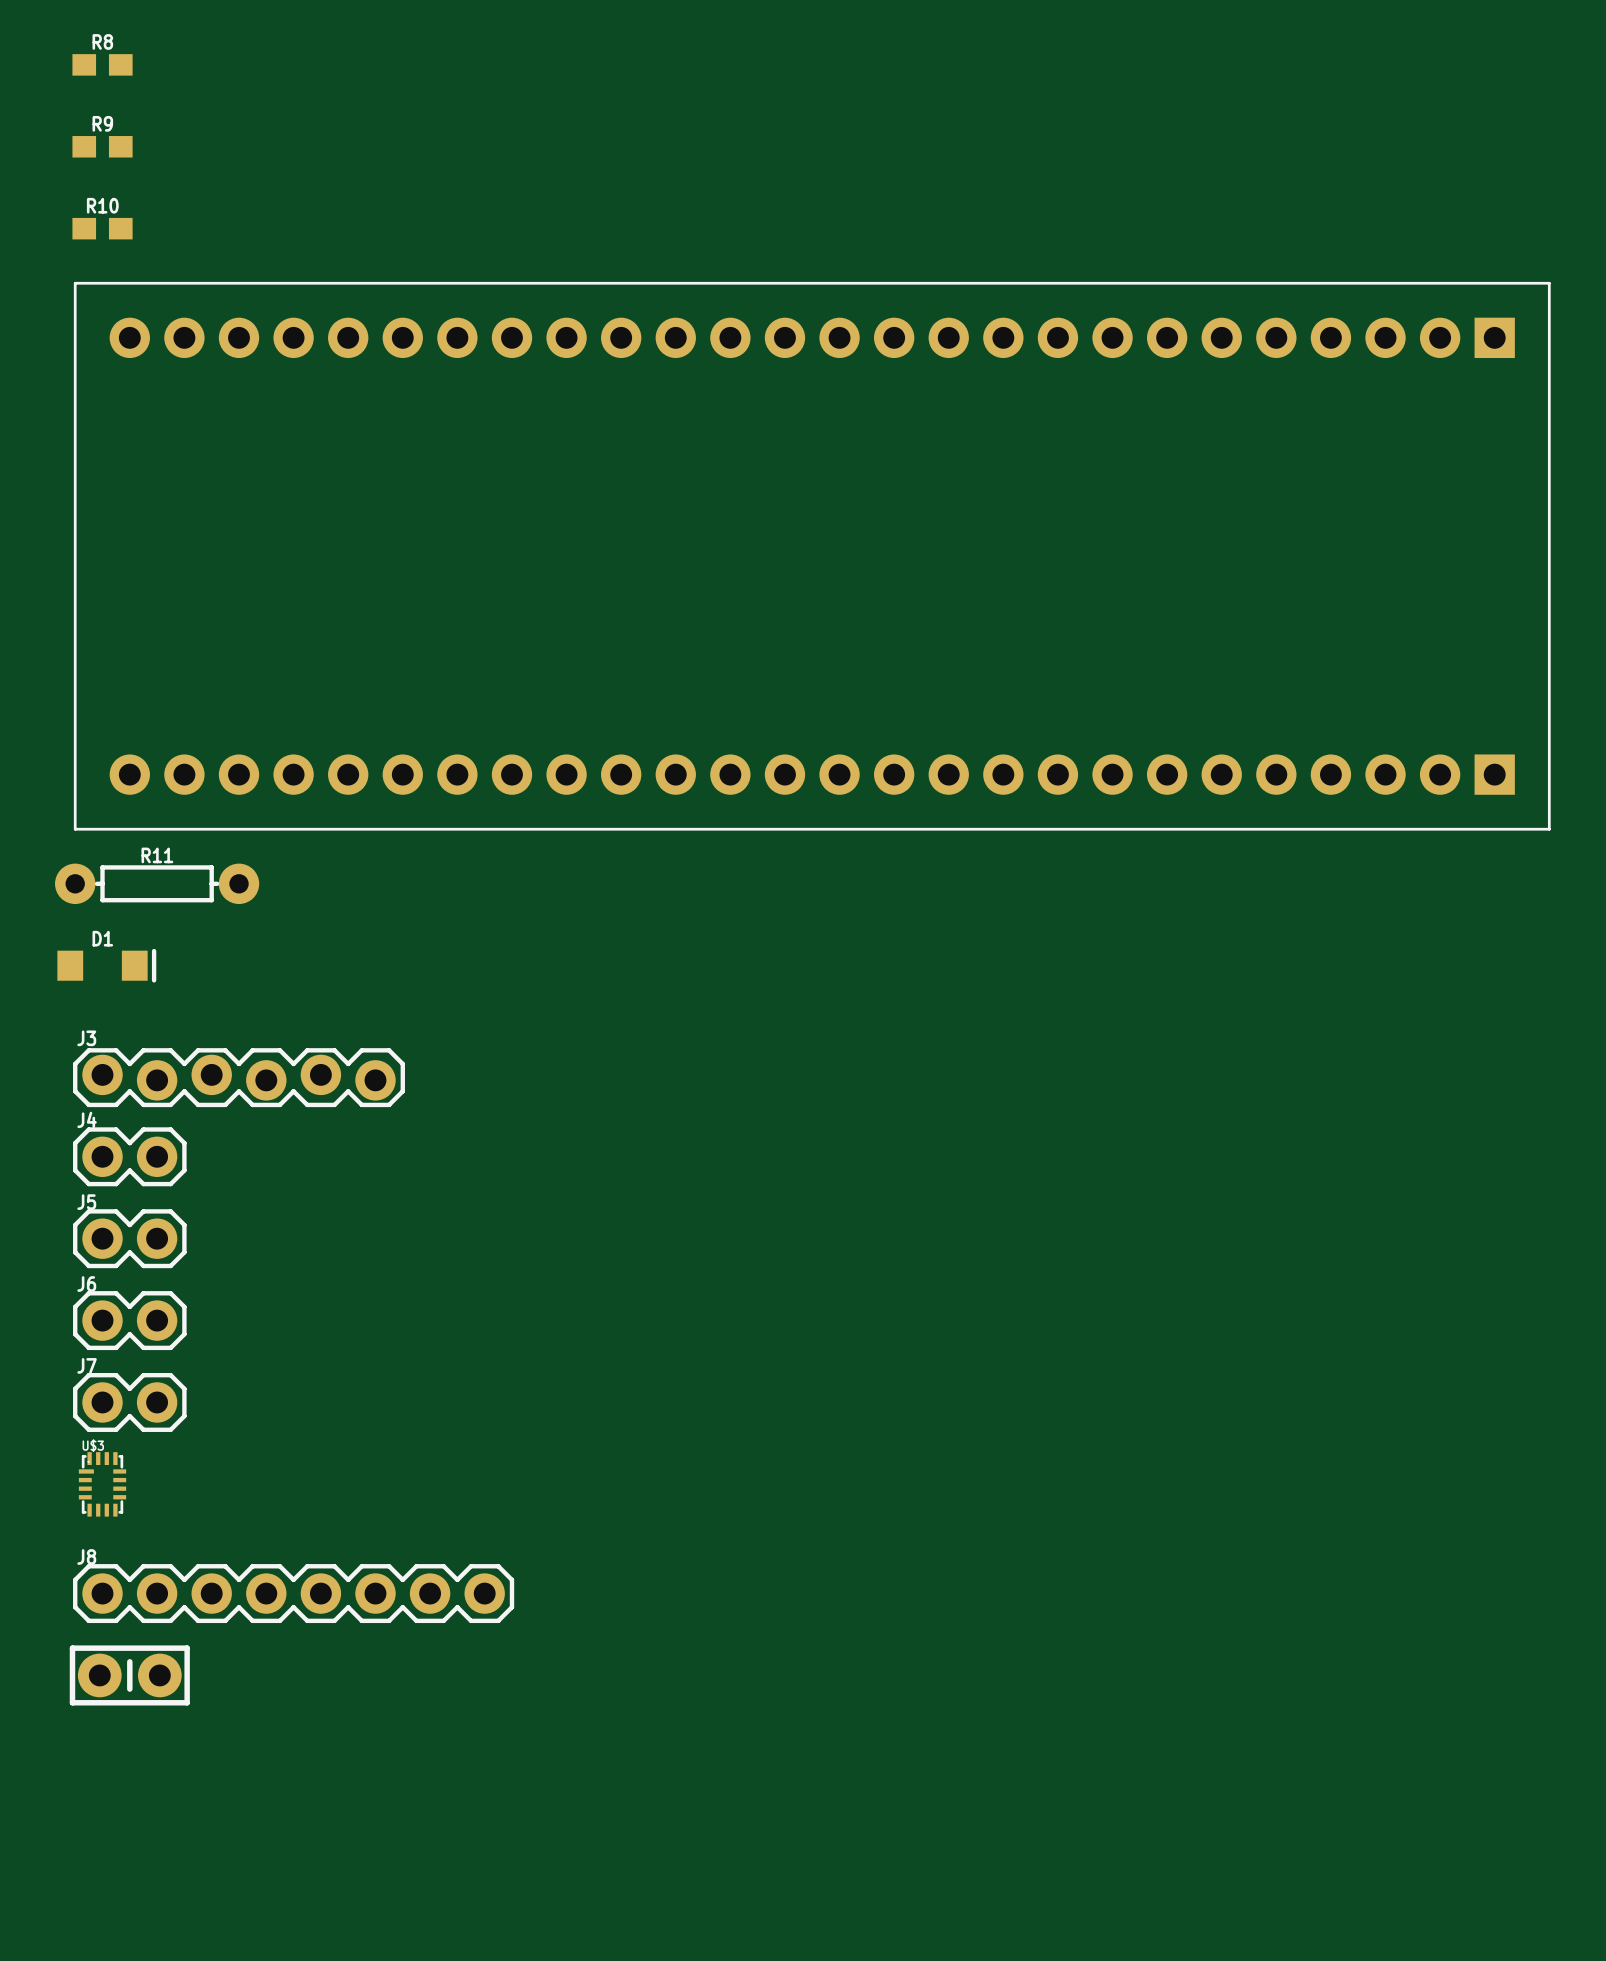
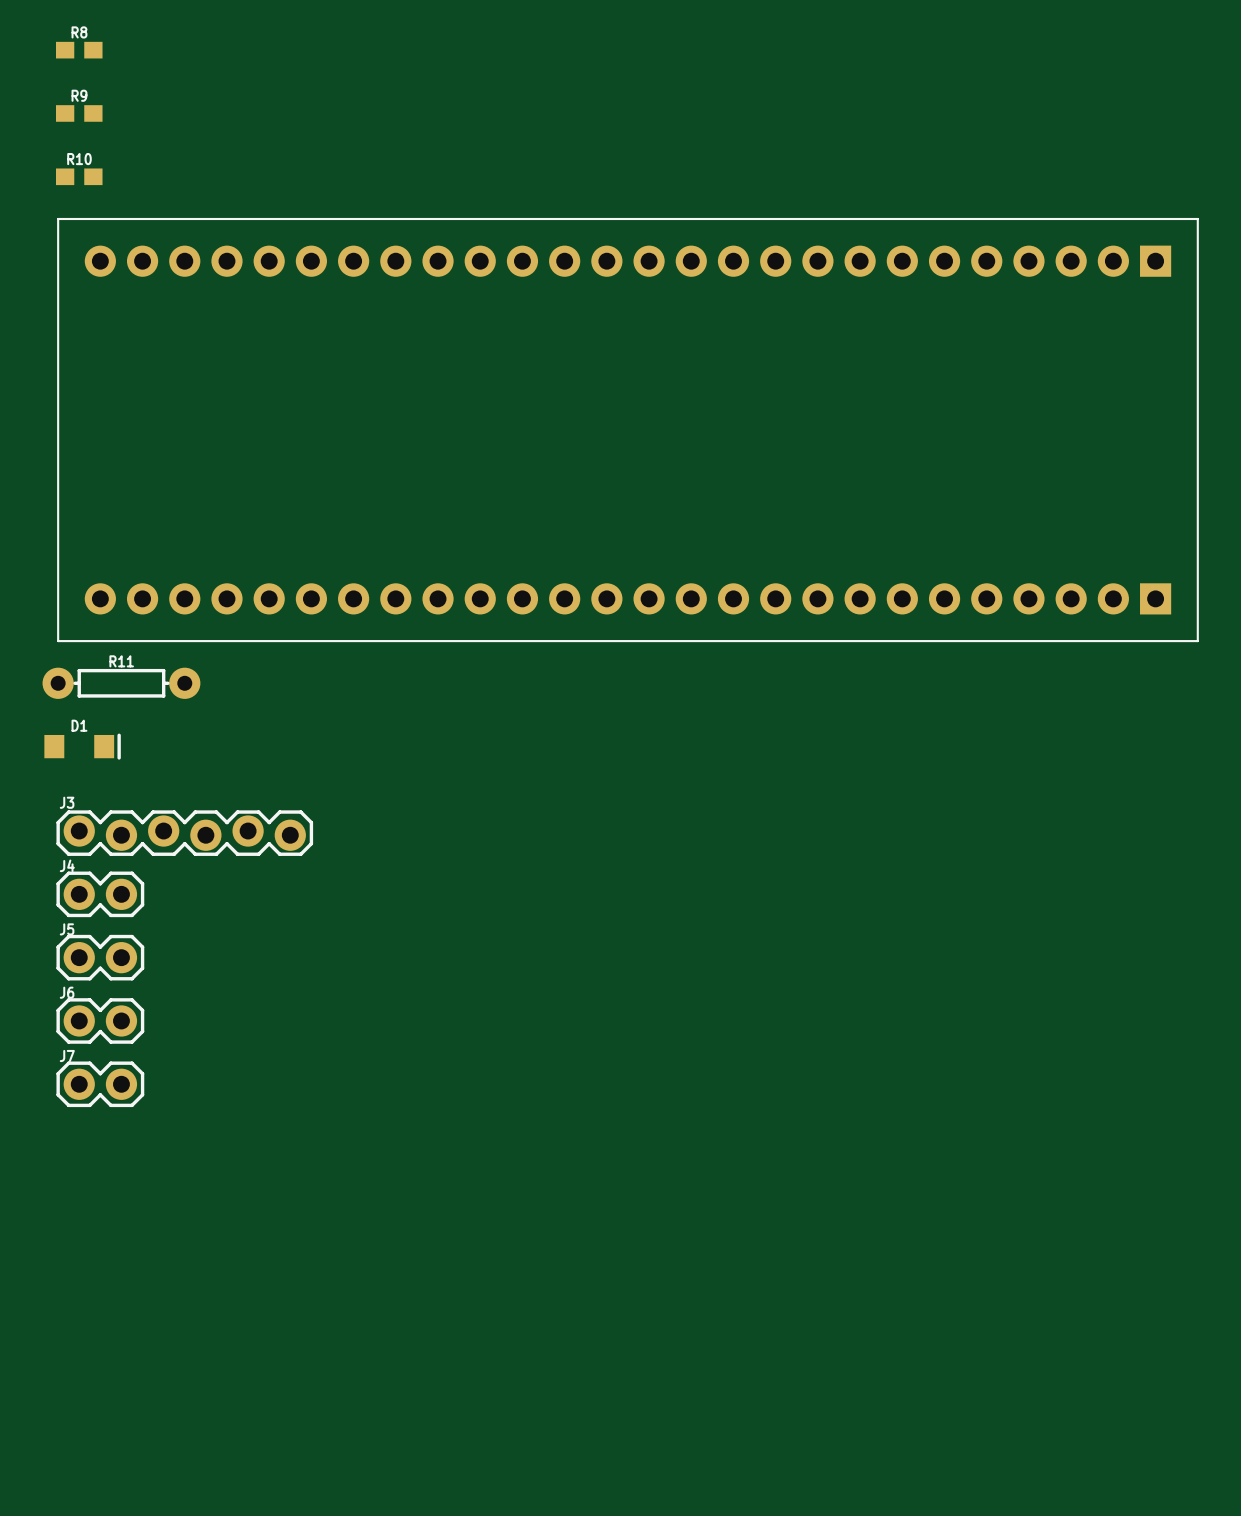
U$3: (102, 1484) -> none
J8: (293, 1593) -> none
part: (129, 1675) -> none

